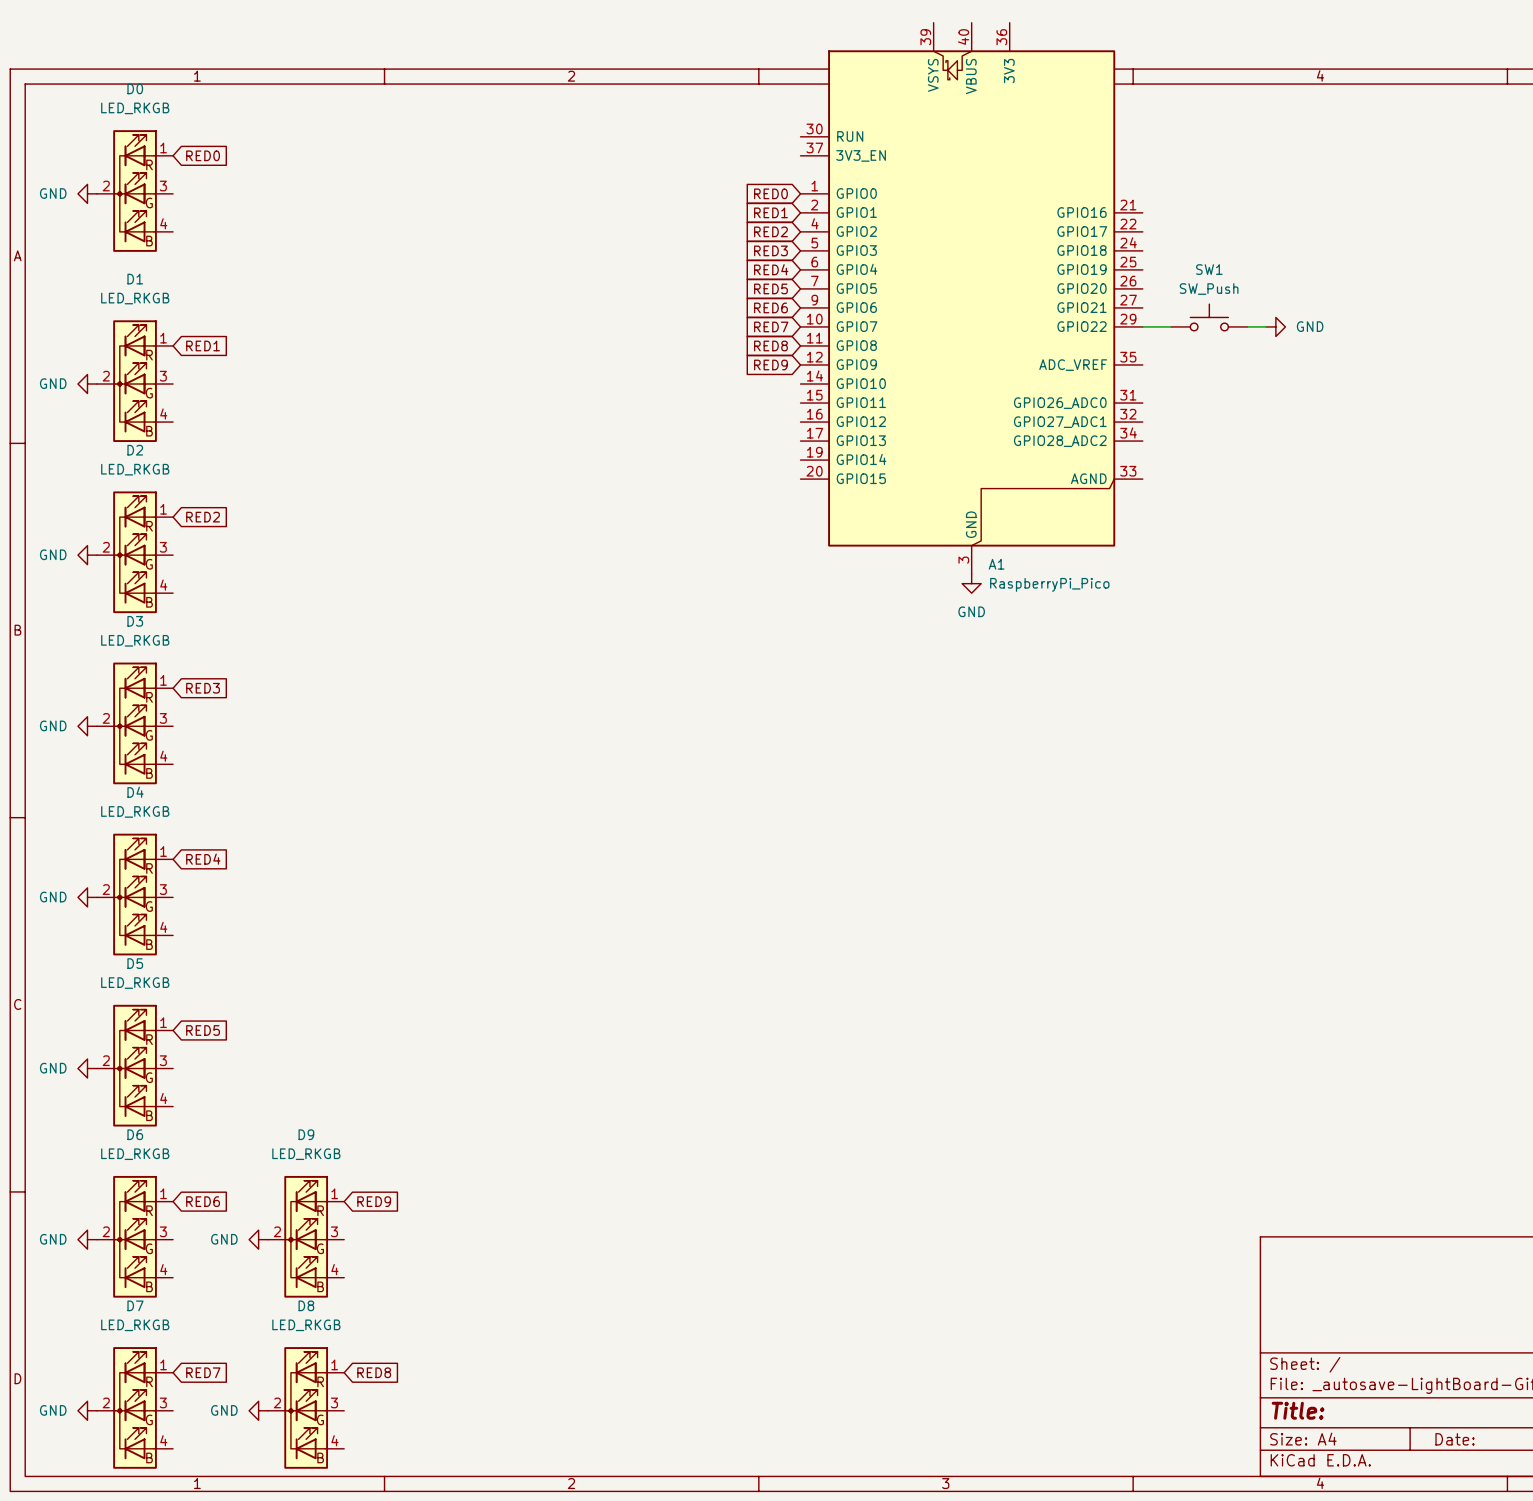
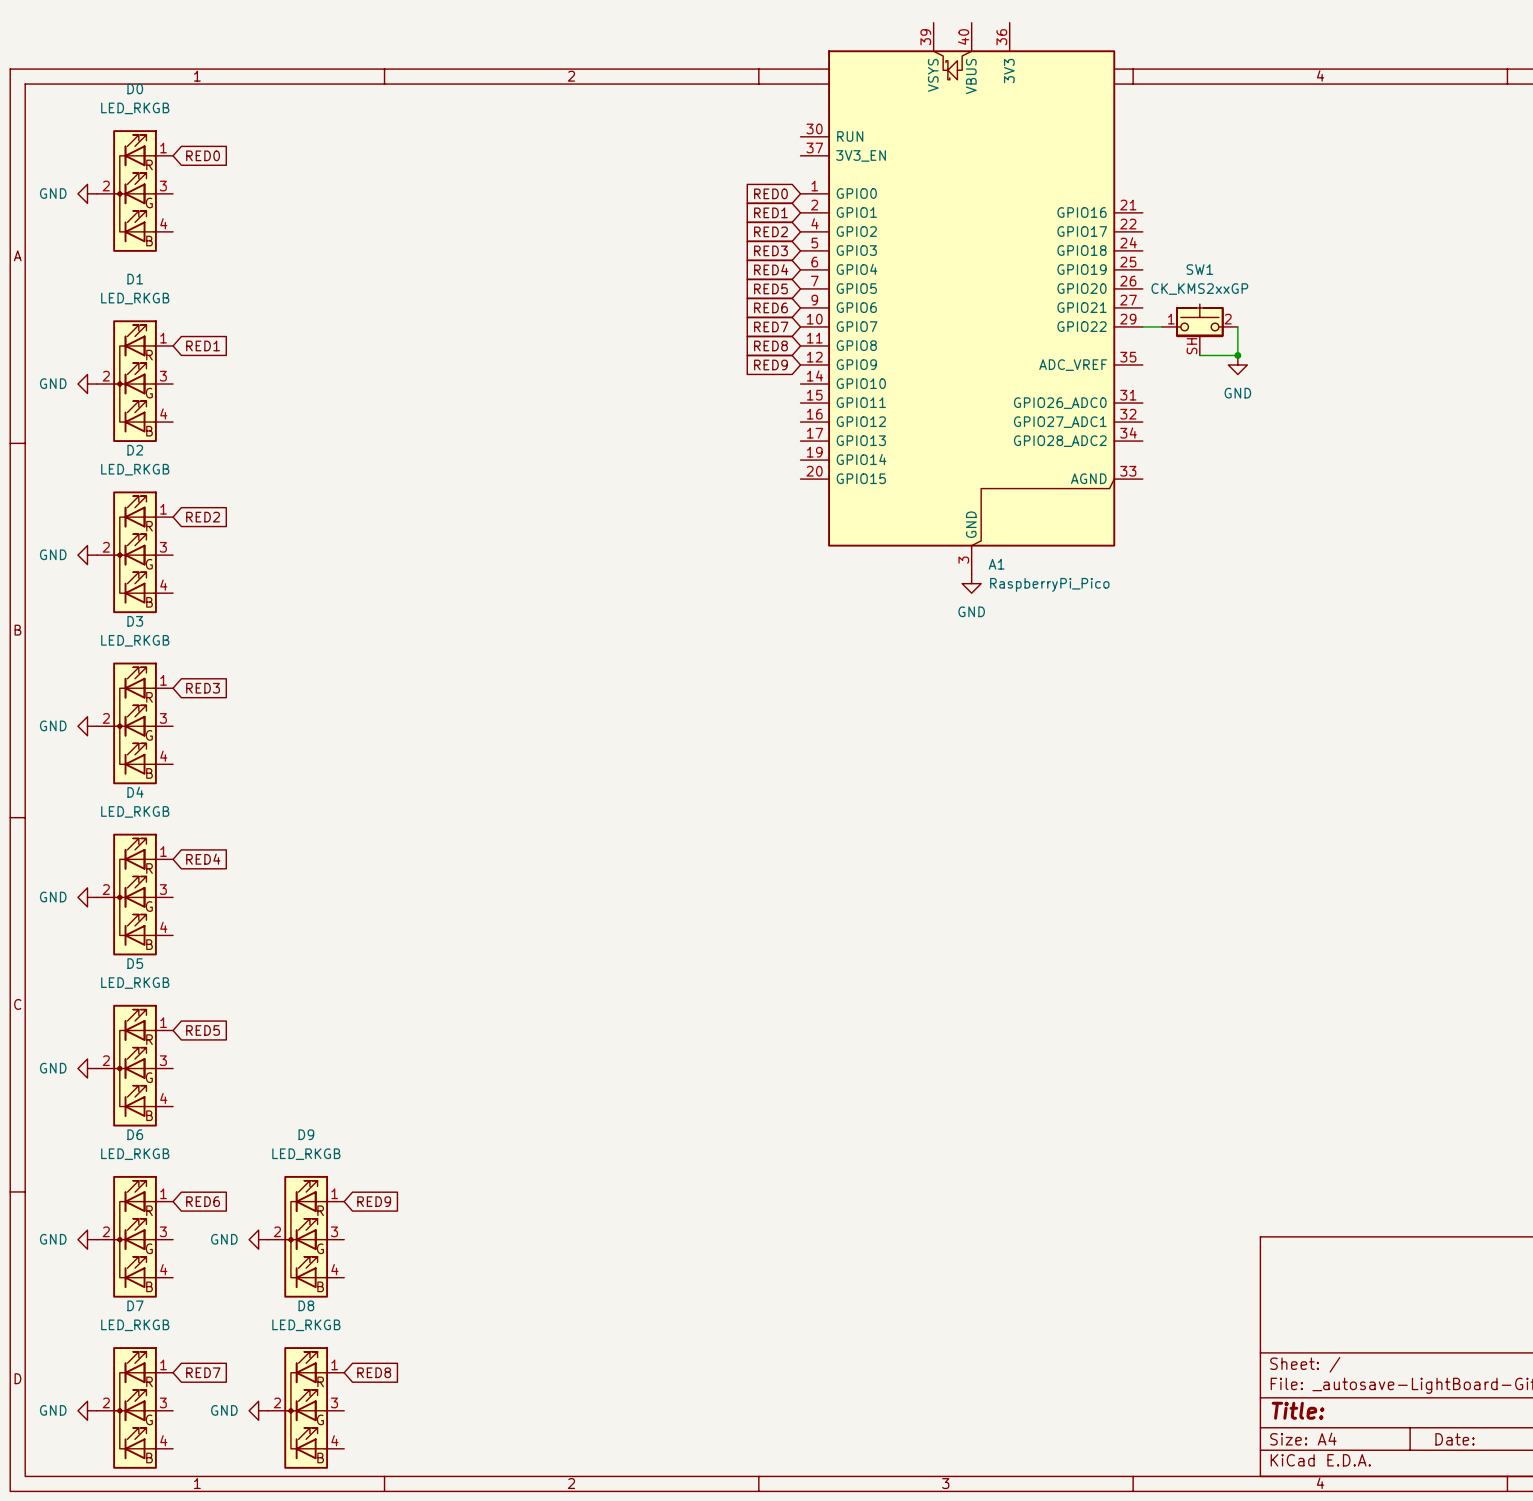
SW1 value: SW_Push (1209, 289) -> CK_KMS2xxGP (1199, 289)
SW1 symbol: [1171, 304, 1248, 331] -> [1161, 304, 1238, 356]
wire: none -> (1237, 326) (1237, 355) (1199, 355)
wire: (1247, 326) (1266, 326) -> none
power symbol rotation: 0° (1275, 326) -> 90° clockwise (1237, 364)
power symbol position: GND (1275, 326) -> GND (1237, 364)
junction: none -> (1237, 355)

